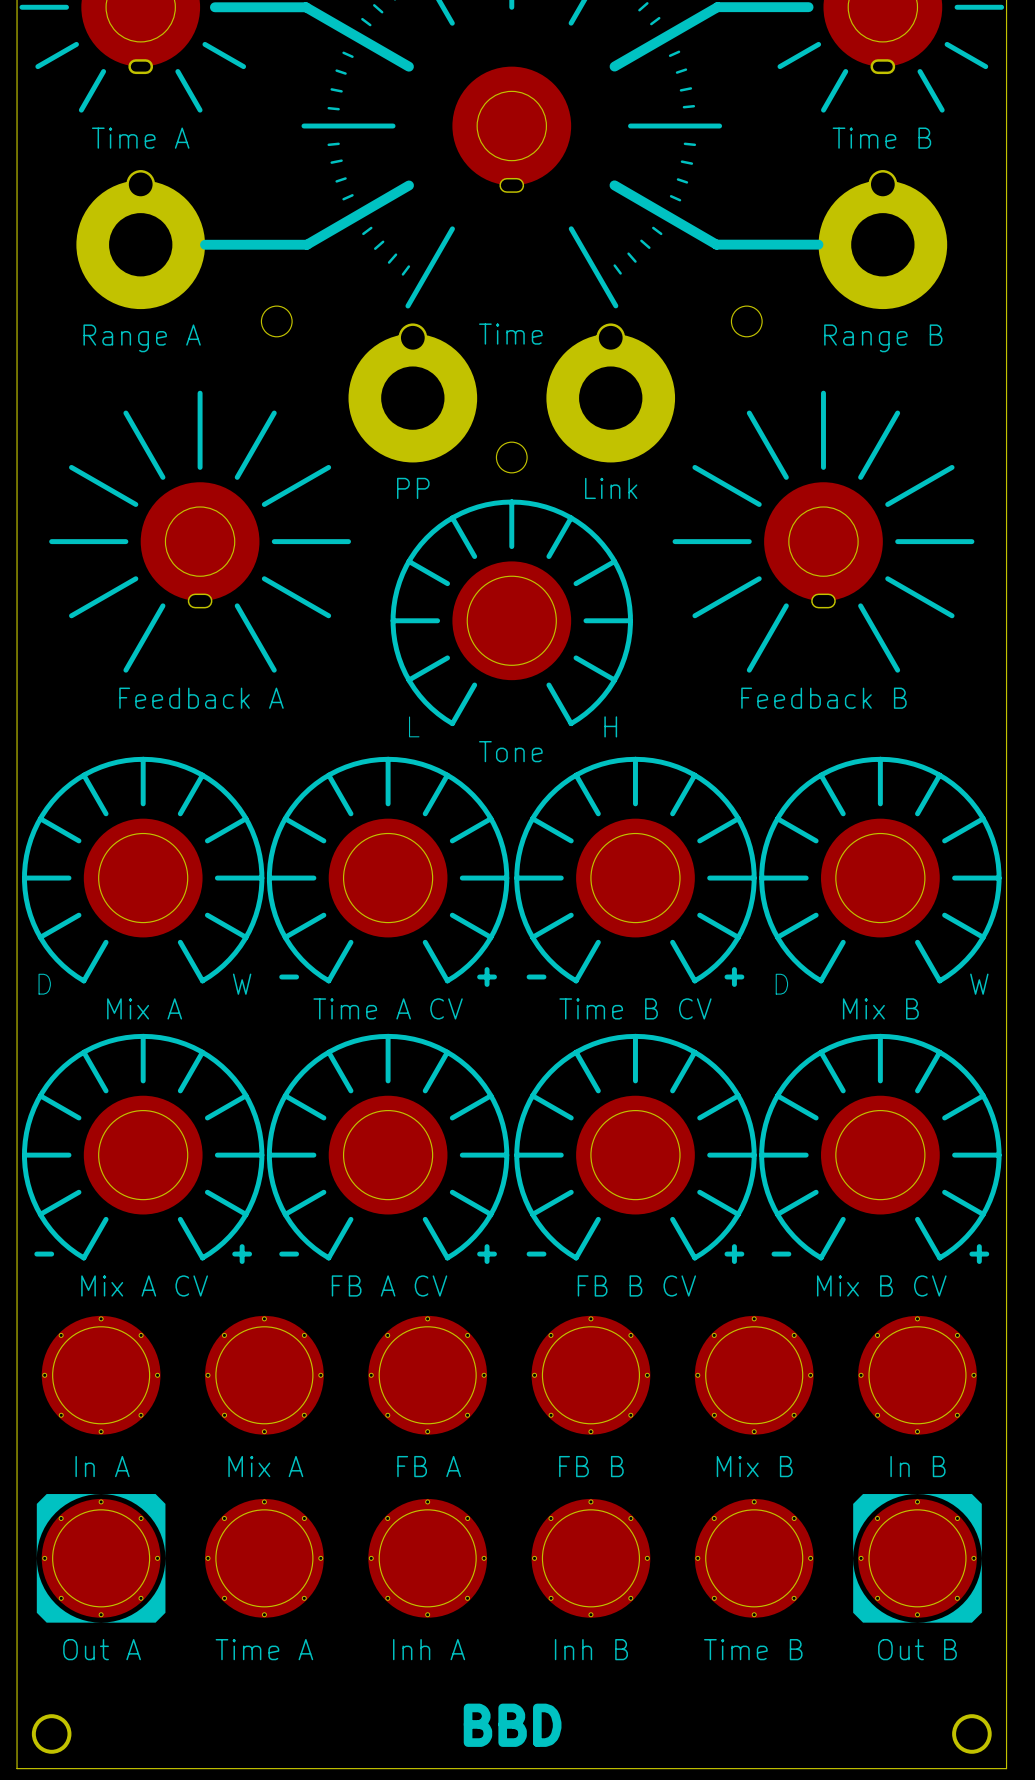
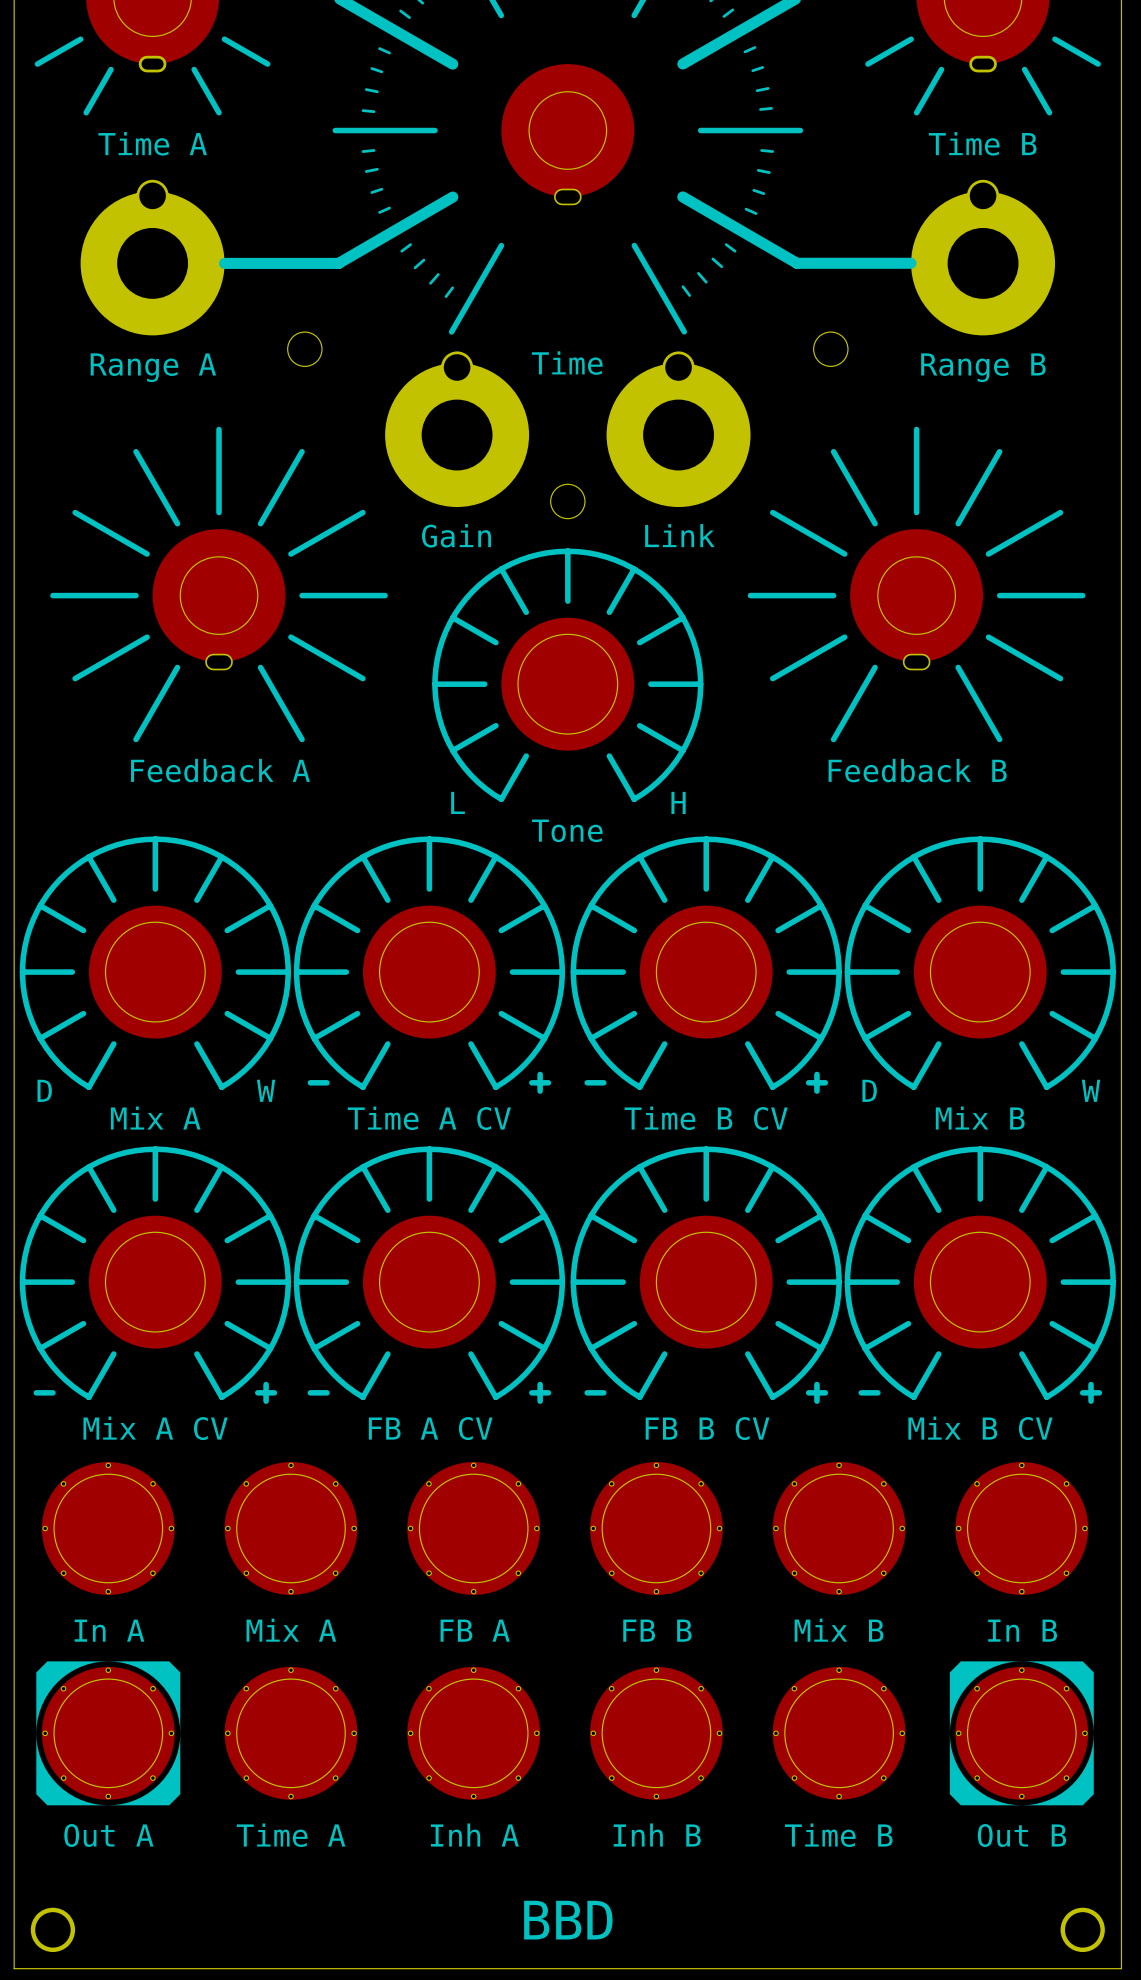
part value: PP (413, 488) -> Gain (456, 535)

